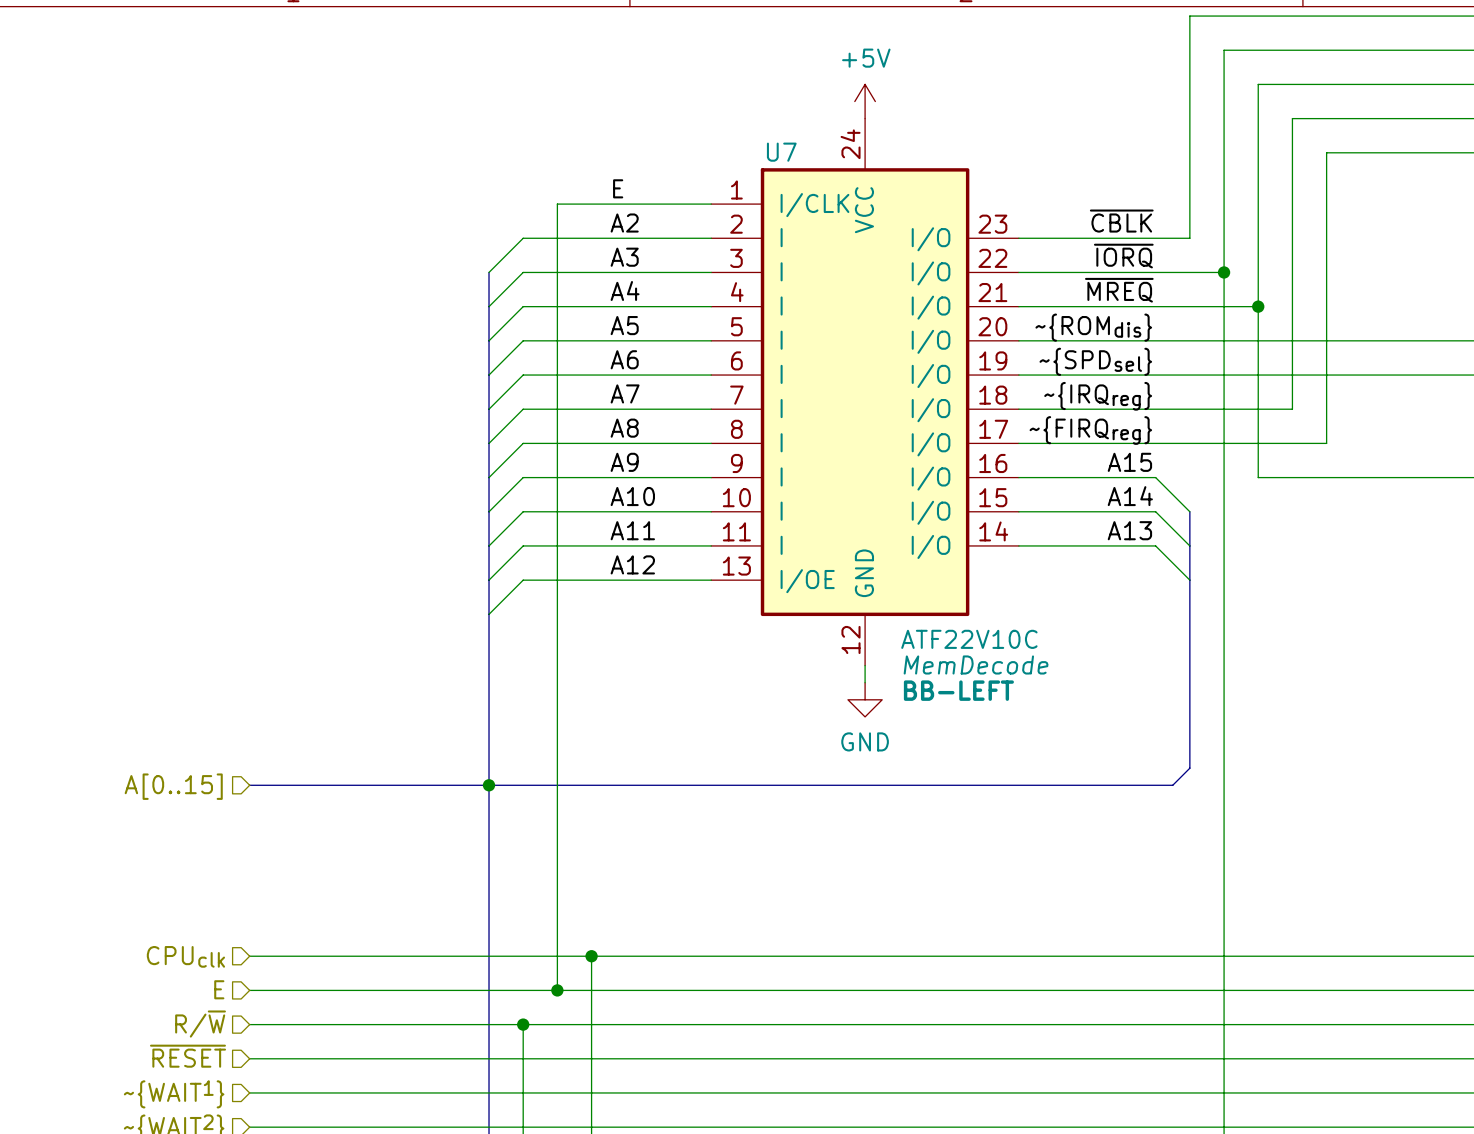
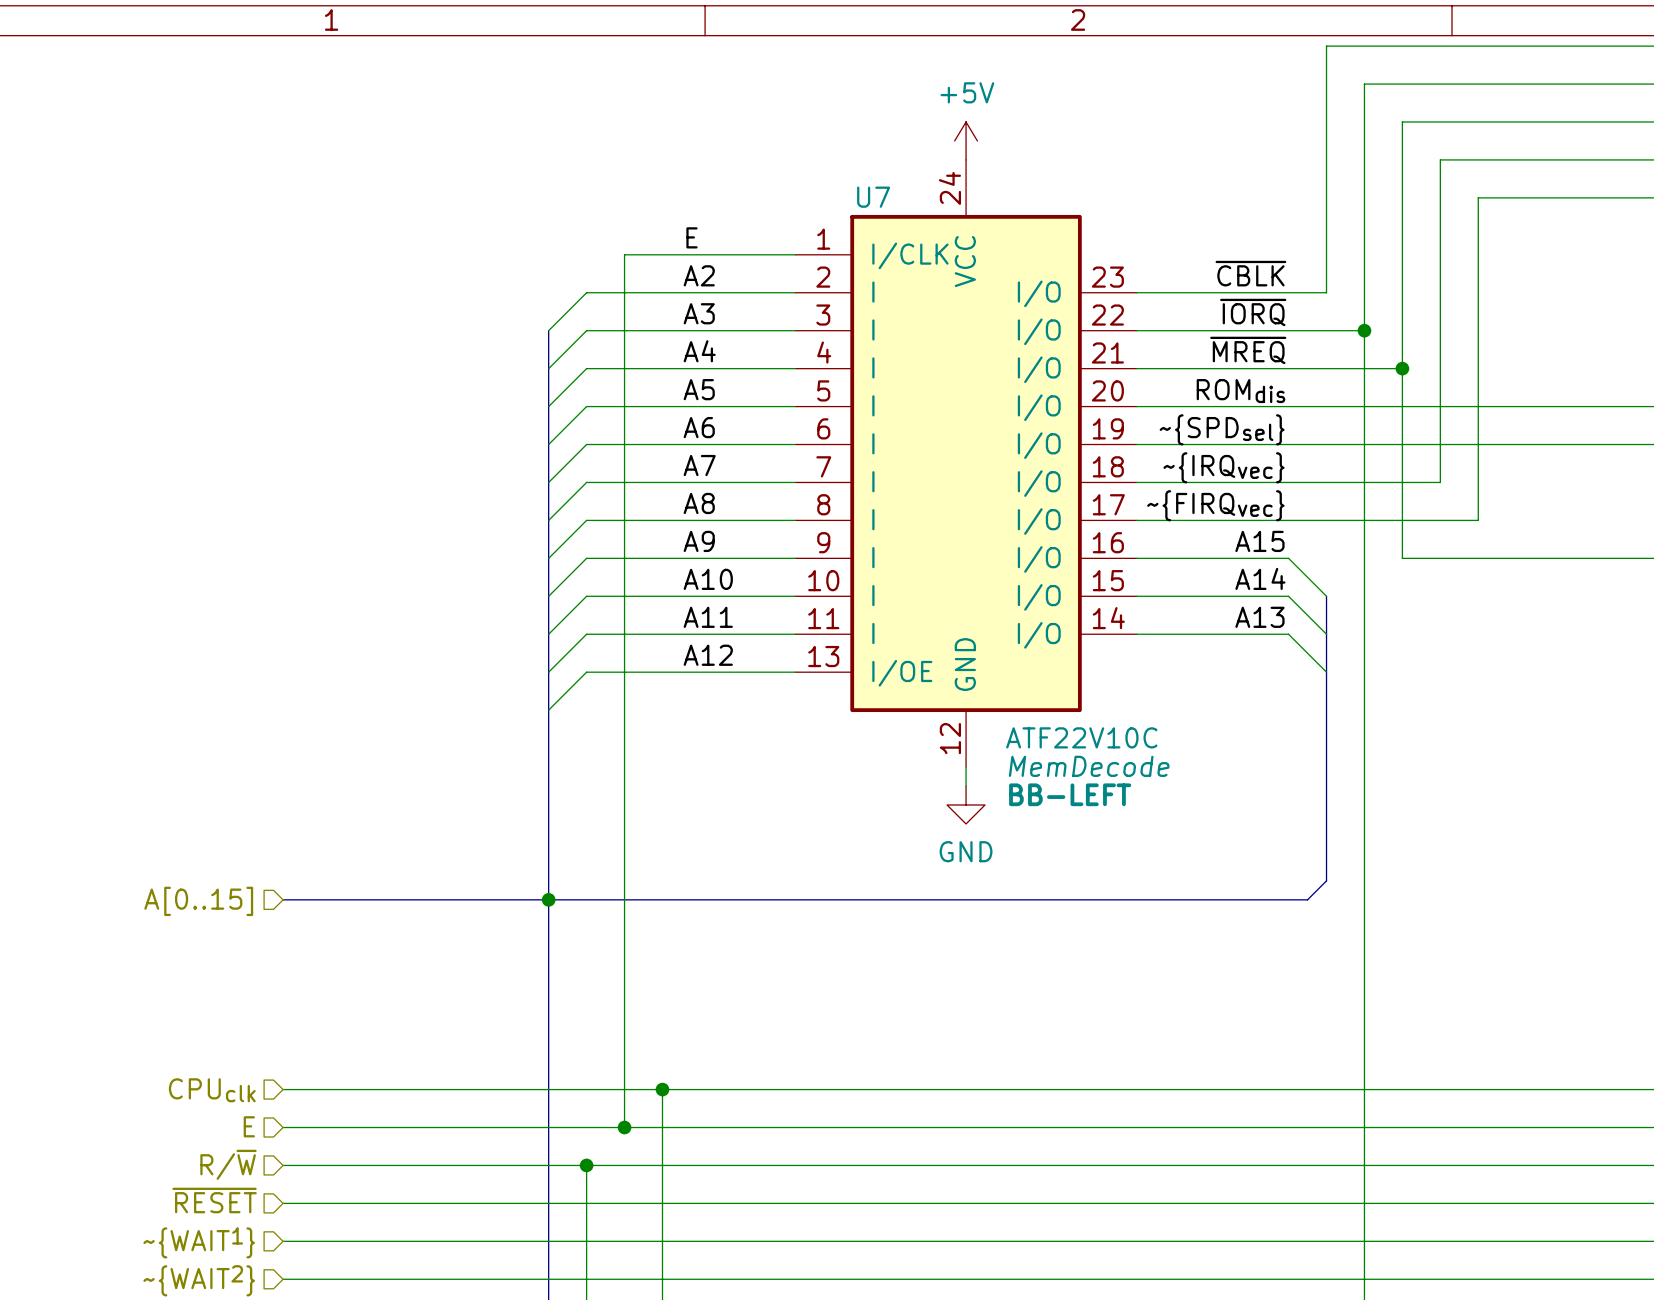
label: ~{ROMdis} (1093, 327) -> ROMdis (1241, 391)
label: ~{IRQreg} (1098, 396) -> ~{IRQvec} (1224, 467)
label: ~{FIRQreg} (1090, 430) -> ~{FIRQvec} (1215, 505)

